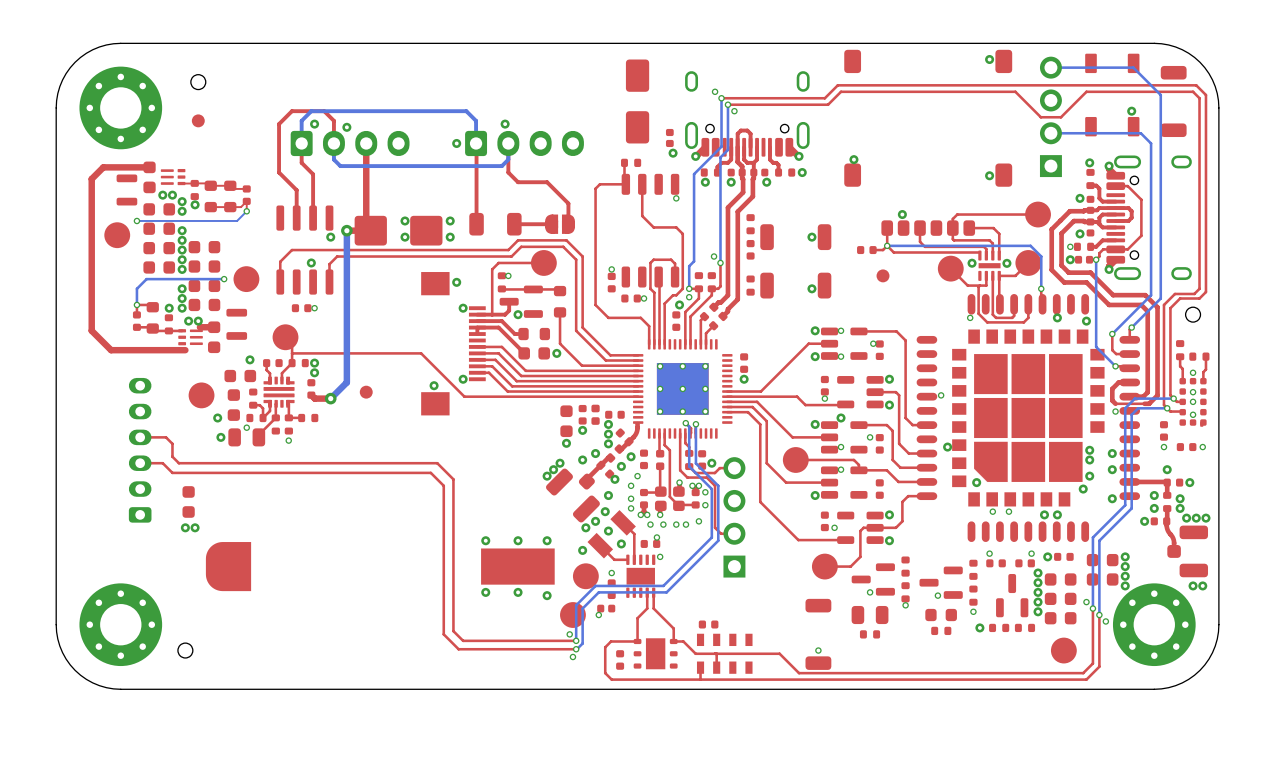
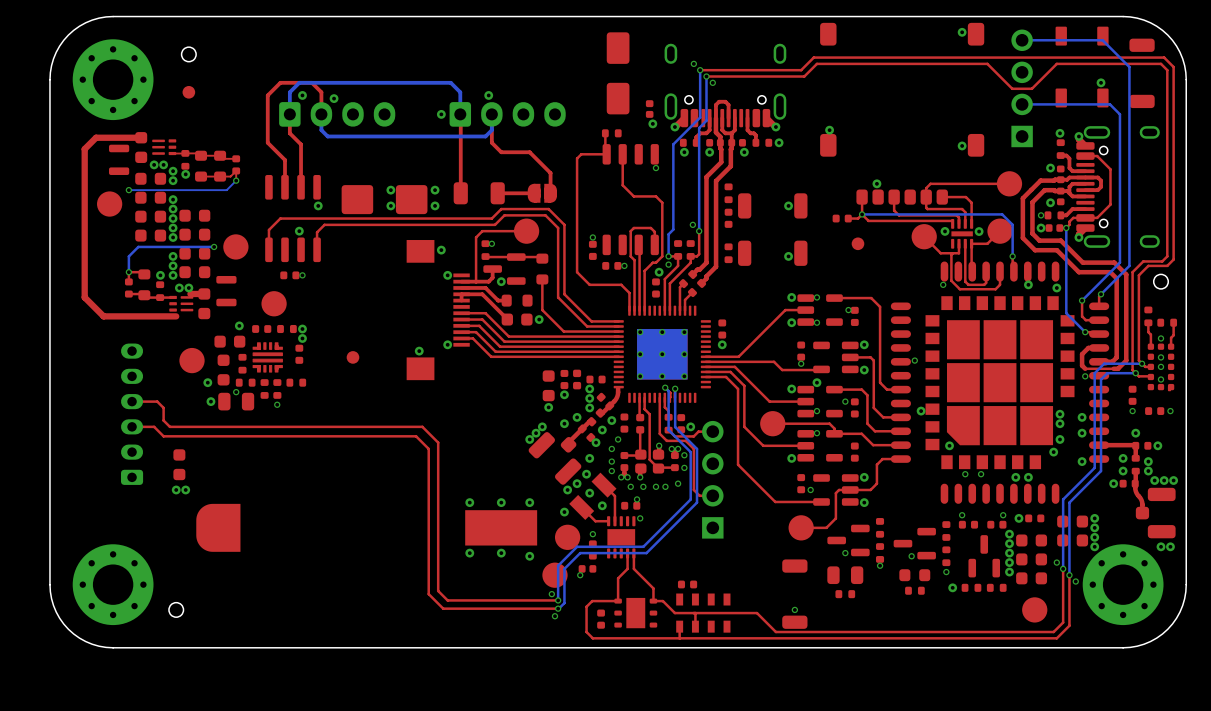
top track: (366, 143) (366, 226) (370, 230) (346, 230) -> none
bottom track: (346, 230) (346, 382) (330, 398) -> none
via: (346, 230) -> none
top track: (285, 337) (292, 343) (292, 363) (281, 373) (281, 380) -> none
top track: (292, 353) (421, 353) (464, 396) (638, 396) -> none
top track: (266, 363) (270, 380) -> none
top track: (311, 395) (314, 398) (330, 398) -> none
via: (330, 398) -> none
top track: (270, 403) (270, 411) (263, 418) (263, 408) (259, 405) (253, 405) -> none
top track: (276, 403) (275, 417) (258, 434) (258, 437) -> none
top track: (288, 403) (288, 417) (301, 417) -> none

